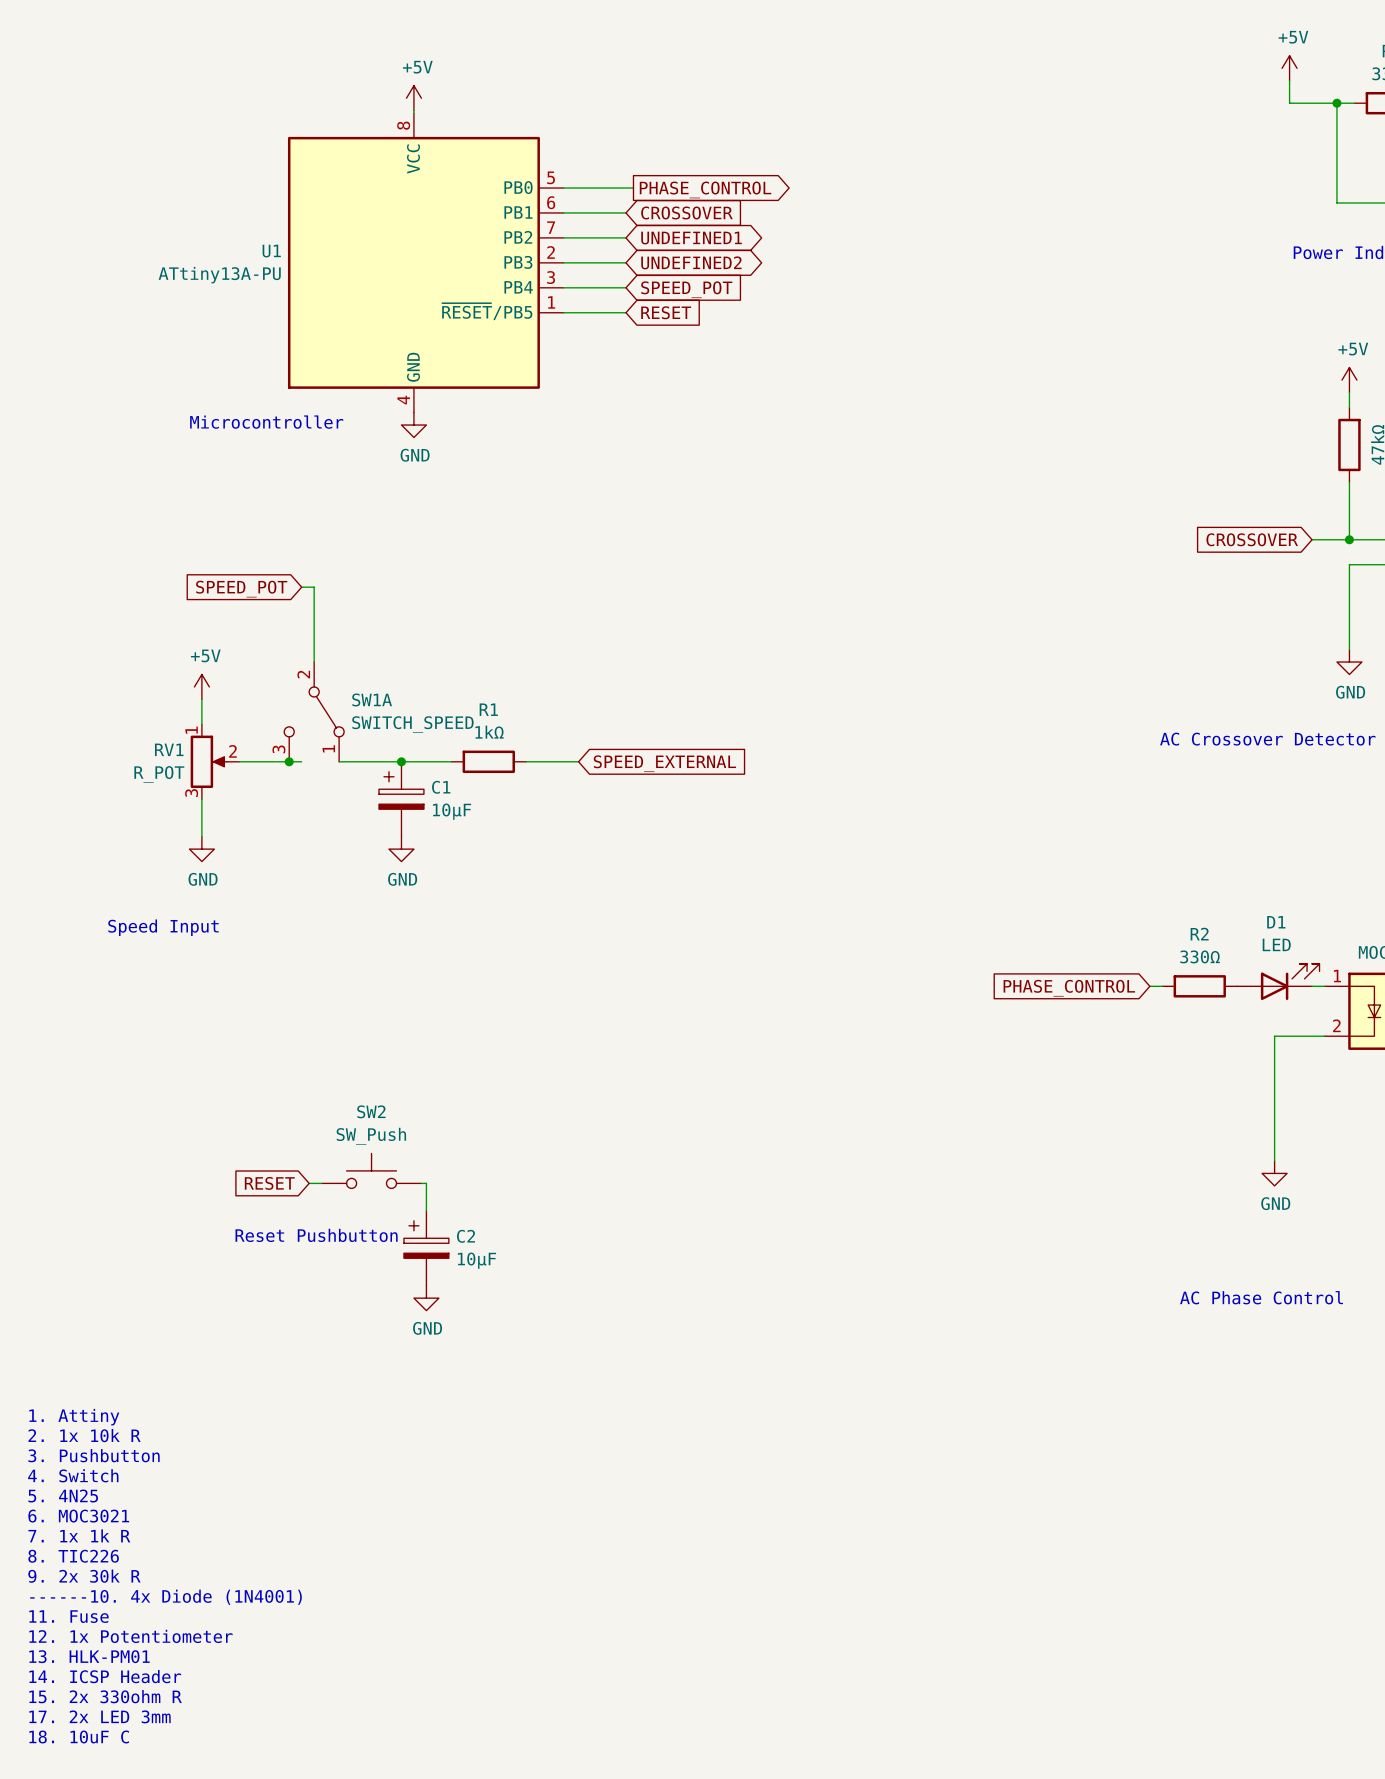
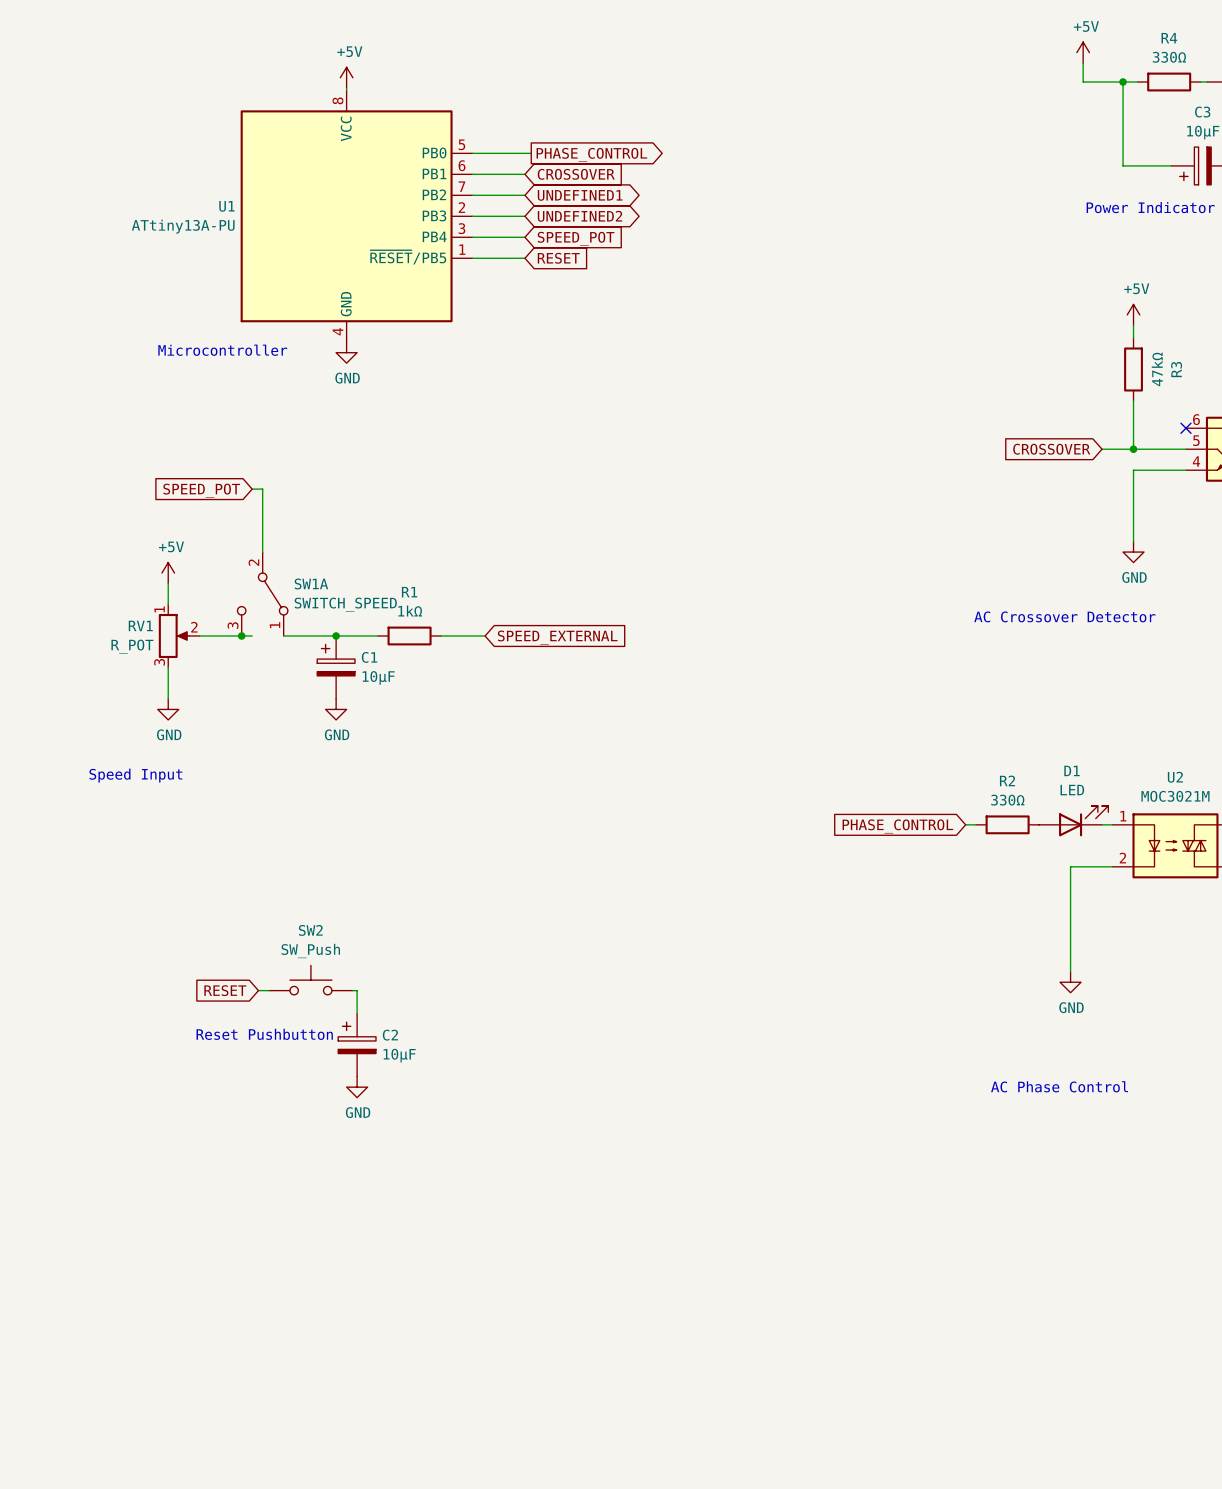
text: 1. Attiny (74, 1417) -> none
text: 2. 1x 10k R (84, 1435) -> none
text: 3. Pushbutton (94, 1455) -> none
text: 4. Switch (73, 1475) -> none
text: 5. 4N25 (63, 1496) -> none
text: 6. MOC3021 (78, 1516) -> none
text: 7. 1x 1k R (79, 1535) -> none
text: 8. TIC226 (73, 1556) -> none
text: 9. 2x 30k R (84, 1576) -> none
text: ------10. 4x Diode (1N4001) (166, 1597) -> none
text: 11. Fuse (68, 1616) -> none
text: 12. 1x Potentiometer (130, 1636) -> none
text: 13. HLK-PM01 (89, 1656) -> none
text: 14. ICSP Header (105, 1676) -> none
text: 15. 2x 330ohm R (105, 1696) -> none
text: 17. 2x LED 3mm (99, 1716) -> none
text: 18. 10uF C (79, 1736) -> none

